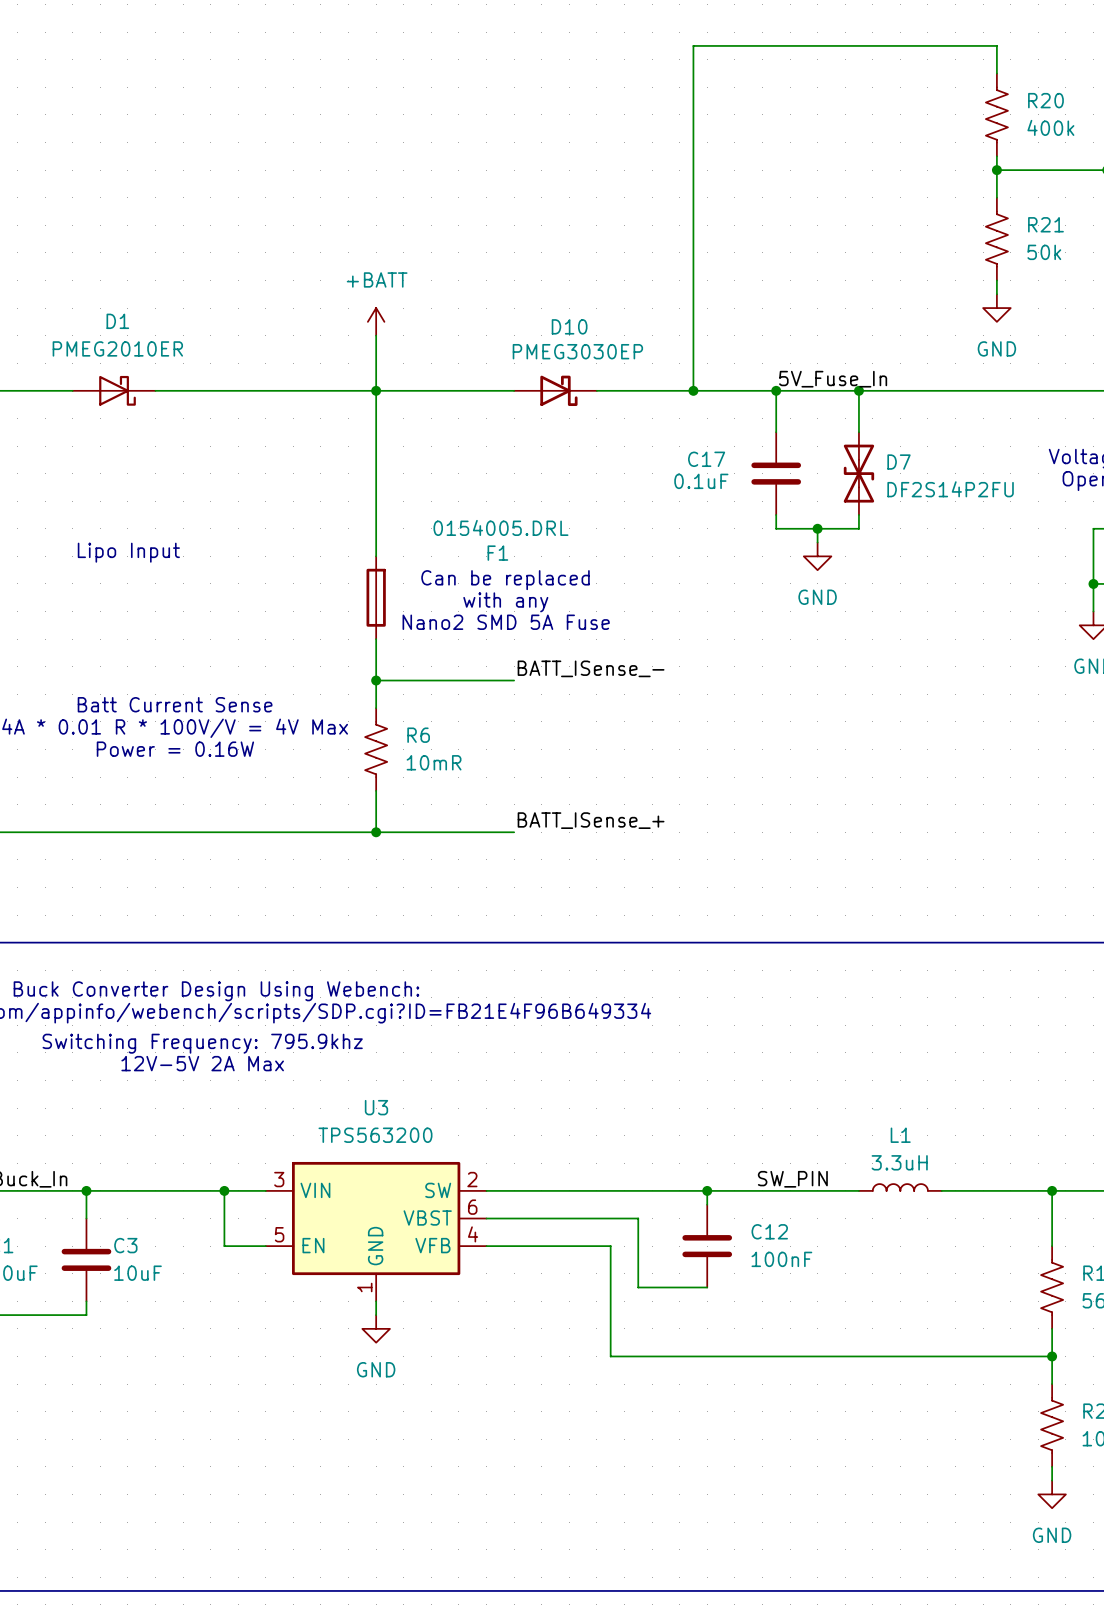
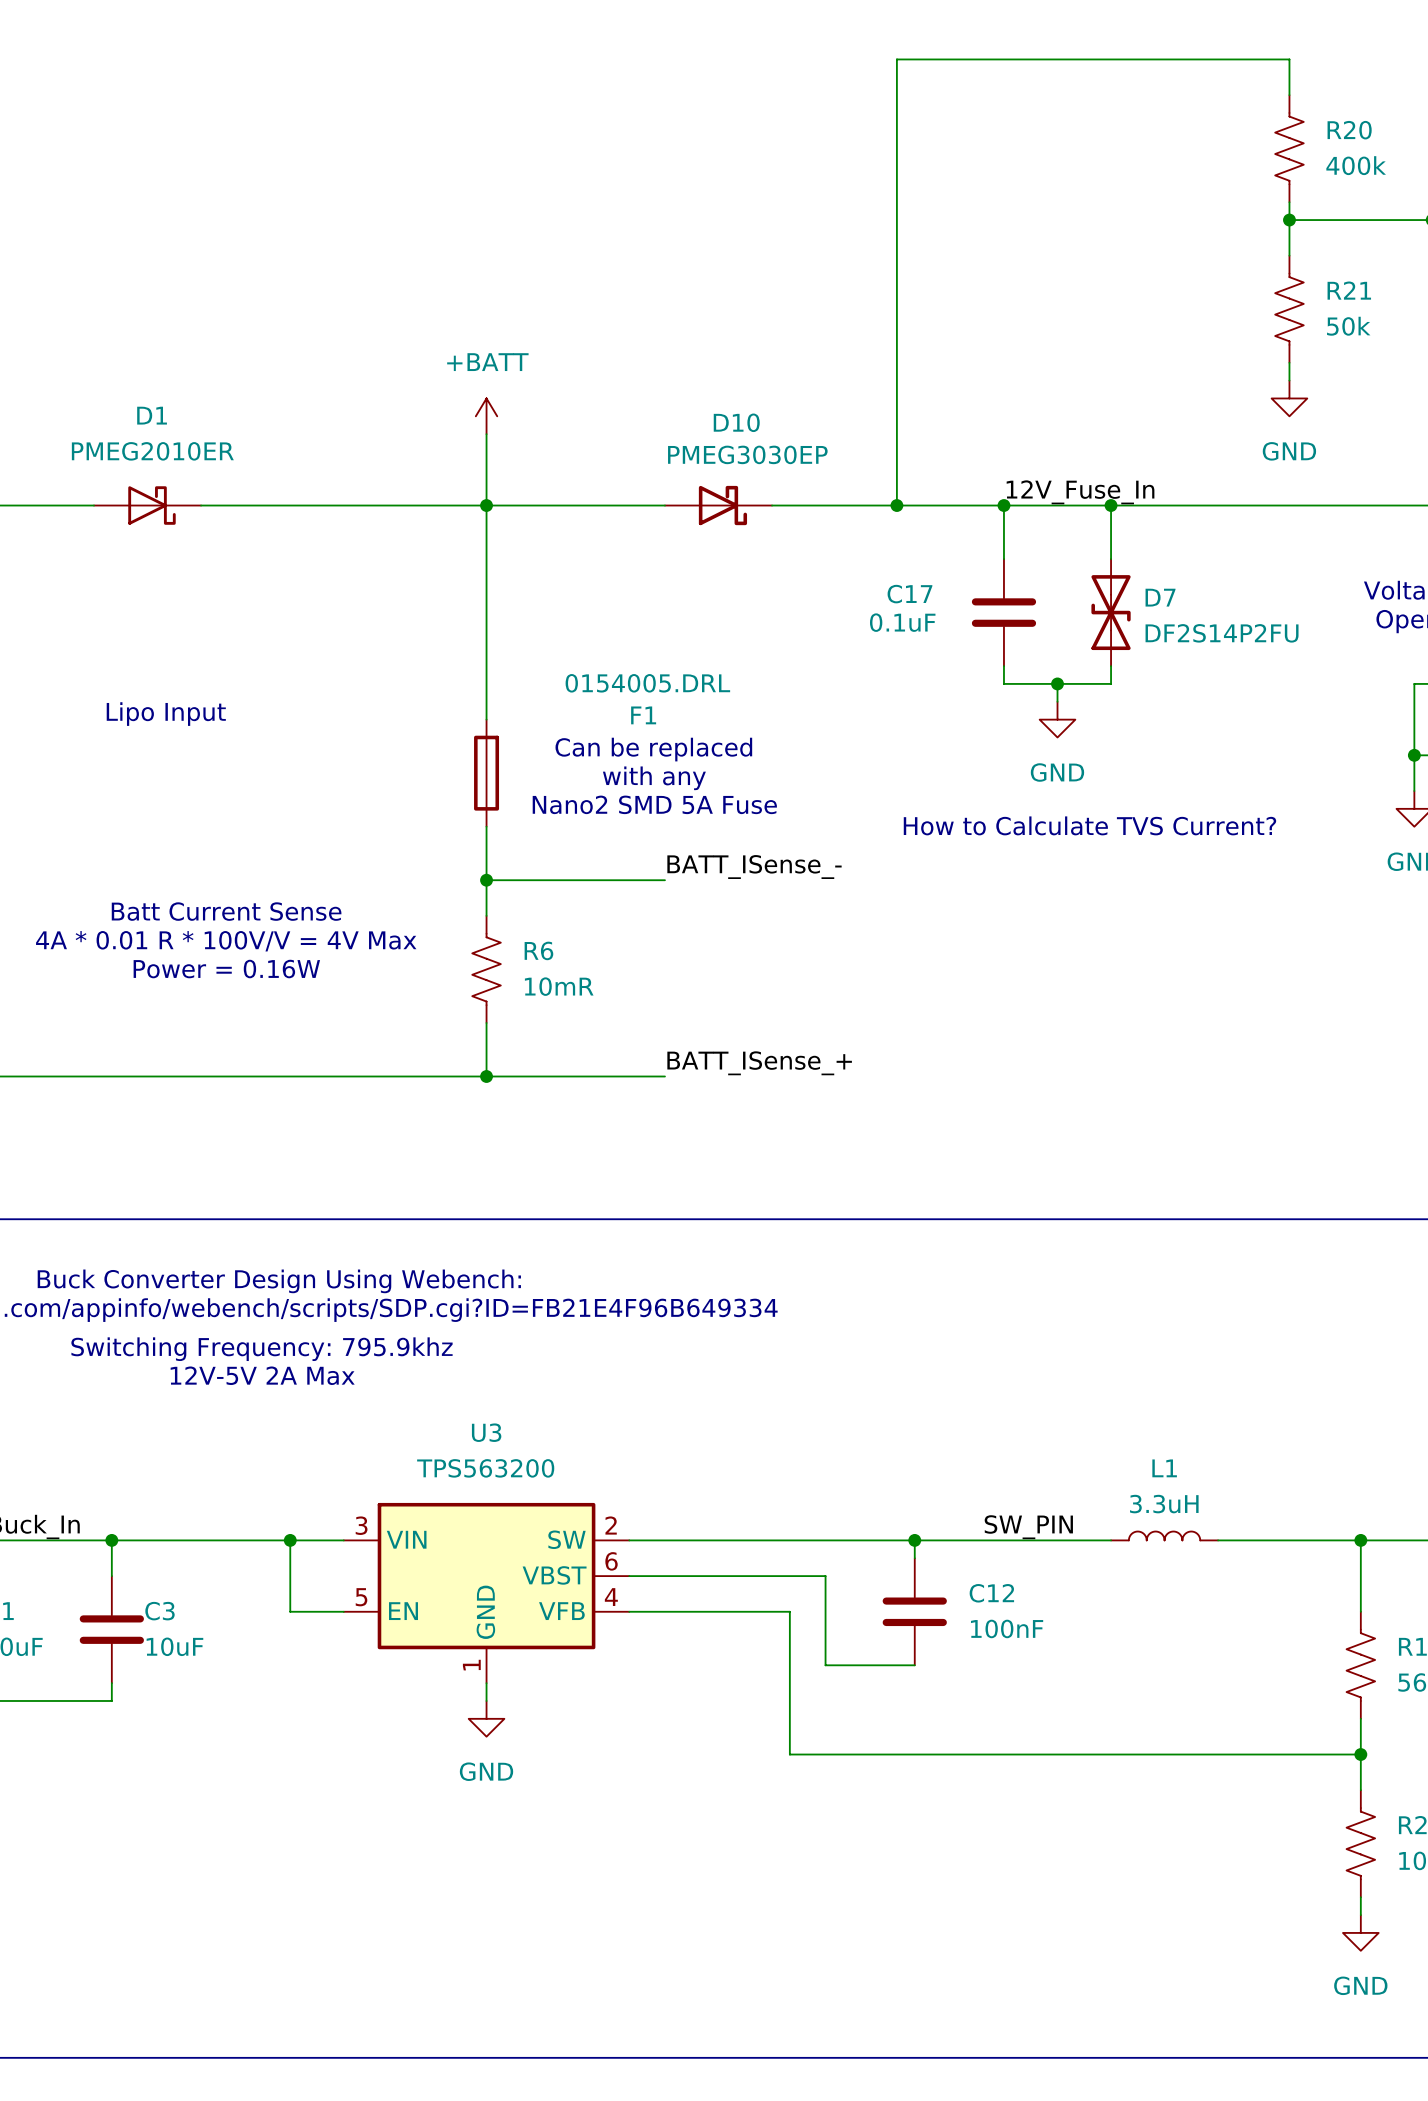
label: 5V_Fuse_In (833, 379) -> 12V_Fuse_In (1080, 492)
text: none -> How to Calculate TVS Current? (1089, 825)

